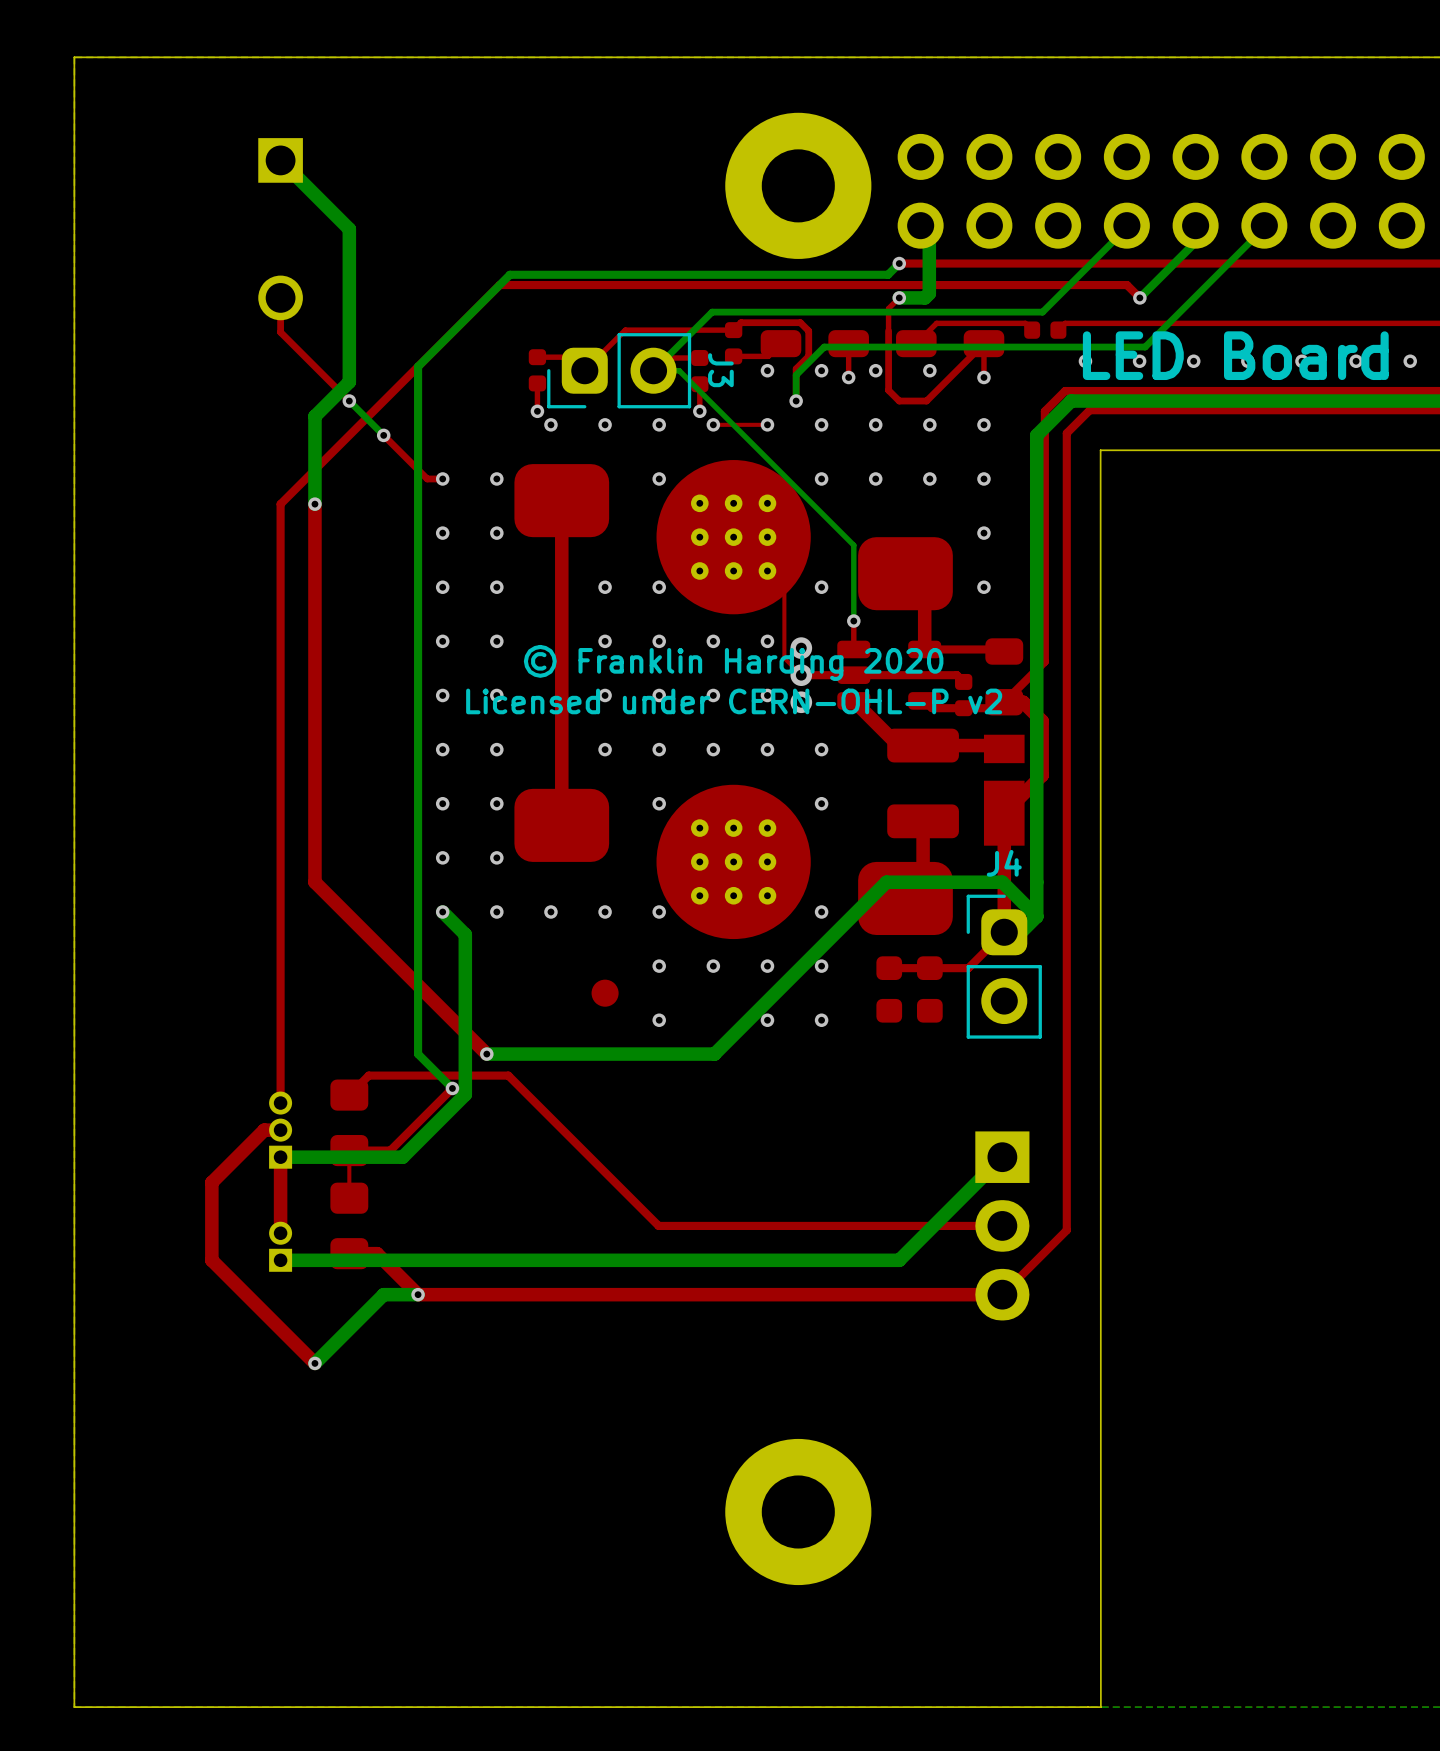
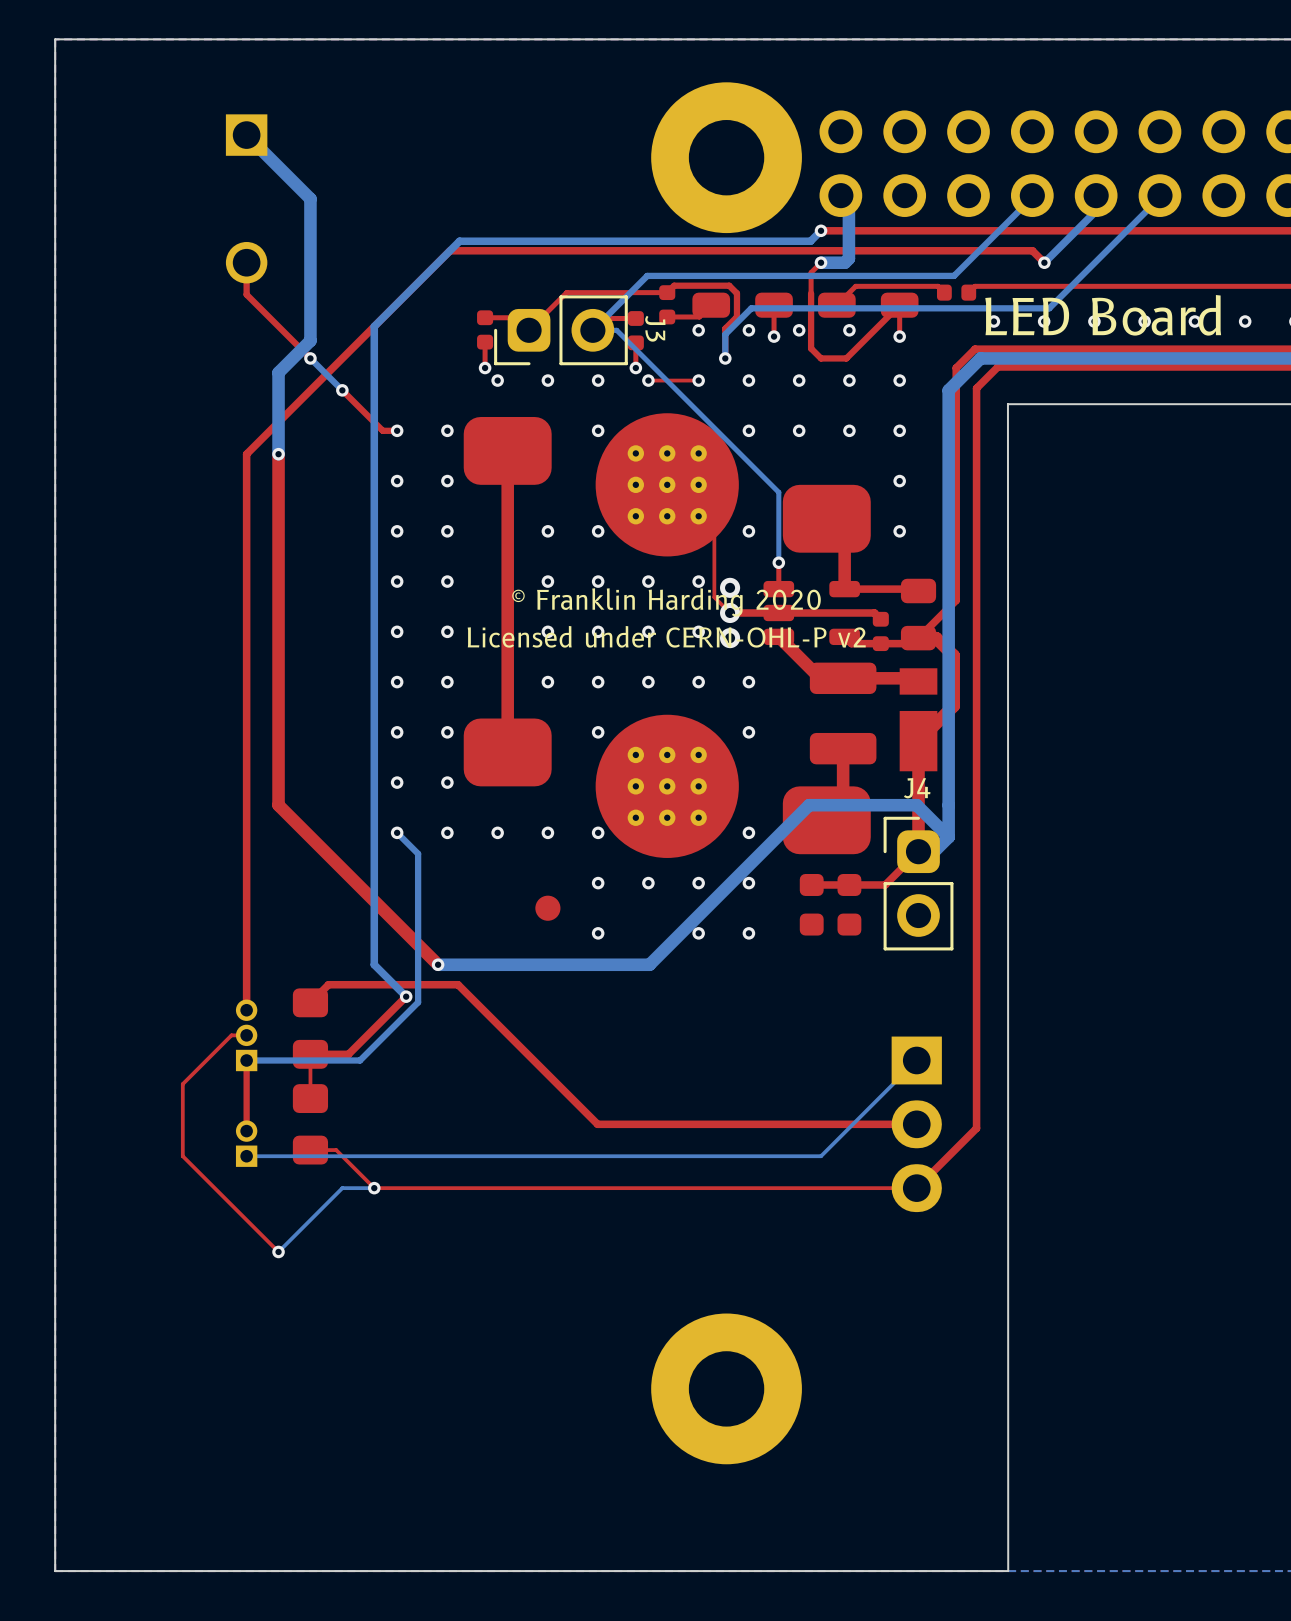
part footprint: [725, 112, 872, 259] -> [651, 82, 802, 234]
bottom track width: thick (442, 911) (465, 934) (465, 1094) (402, 1157) (280, 1157) -> thin (397, 832) (418, 853) (418, 1002) (360, 1060) (246, 1060)
top track width: thick (280, 1130) (264, 1130) (211, 1182) (211, 1260) (314, 1363) -> thin (246, 1035) (231, 1035) (182, 1084) (182, 1156) (278, 1251)
top track width: thick (280, 1157) (280, 1233) -> thin (246, 1060) (246, 1131)
bottom track width: thick (1002, 1157) (899, 1260) (280, 1260) -> thin (916, 1060) (821, 1156) (246, 1156)
top track width: thick (349, 1253) (377, 1253) (418, 1294) (1002, 1294) -> thin (310, 1150) (336, 1150) (374, 1188) (916, 1188)
bottom track width: thick (418, 1294) (383, 1294) (314, 1363) -> thin (374, 1188) (342, 1188) (278, 1251)
part footprint: [725, 1438, 872, 1586] -> [651, 1313, 802, 1465]

